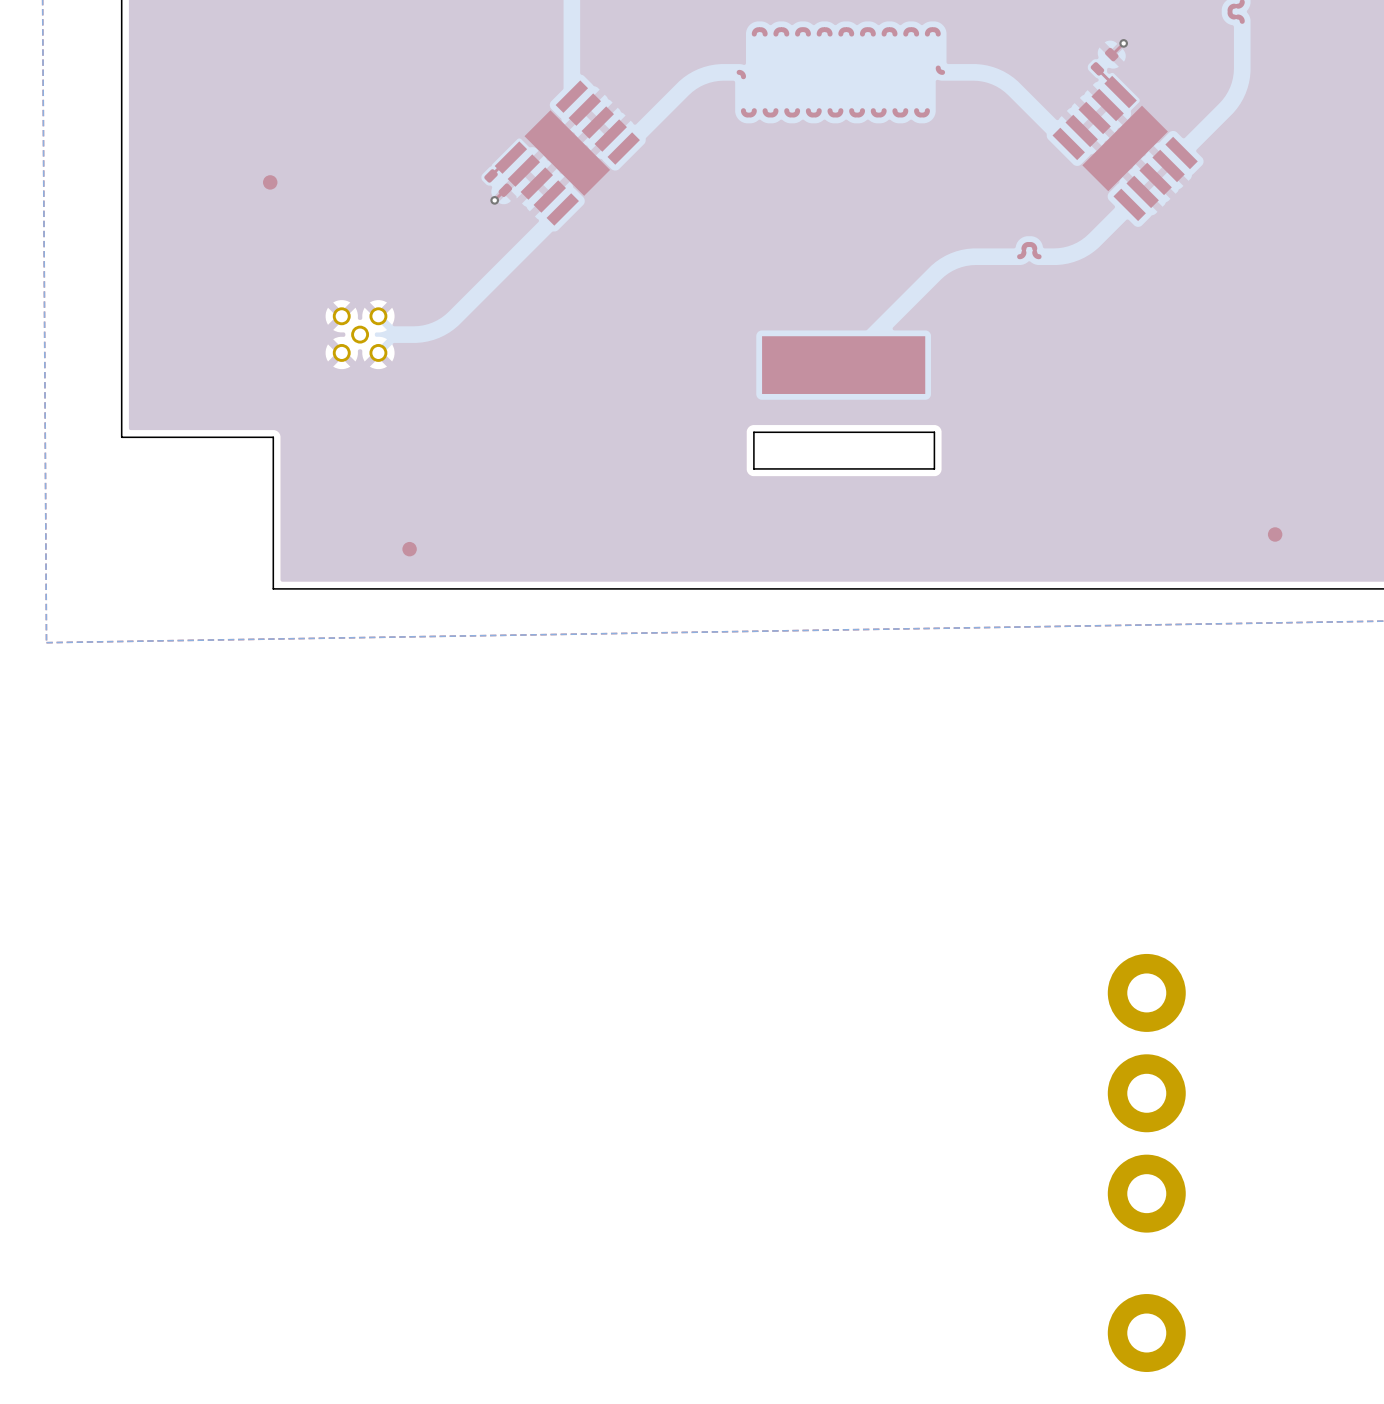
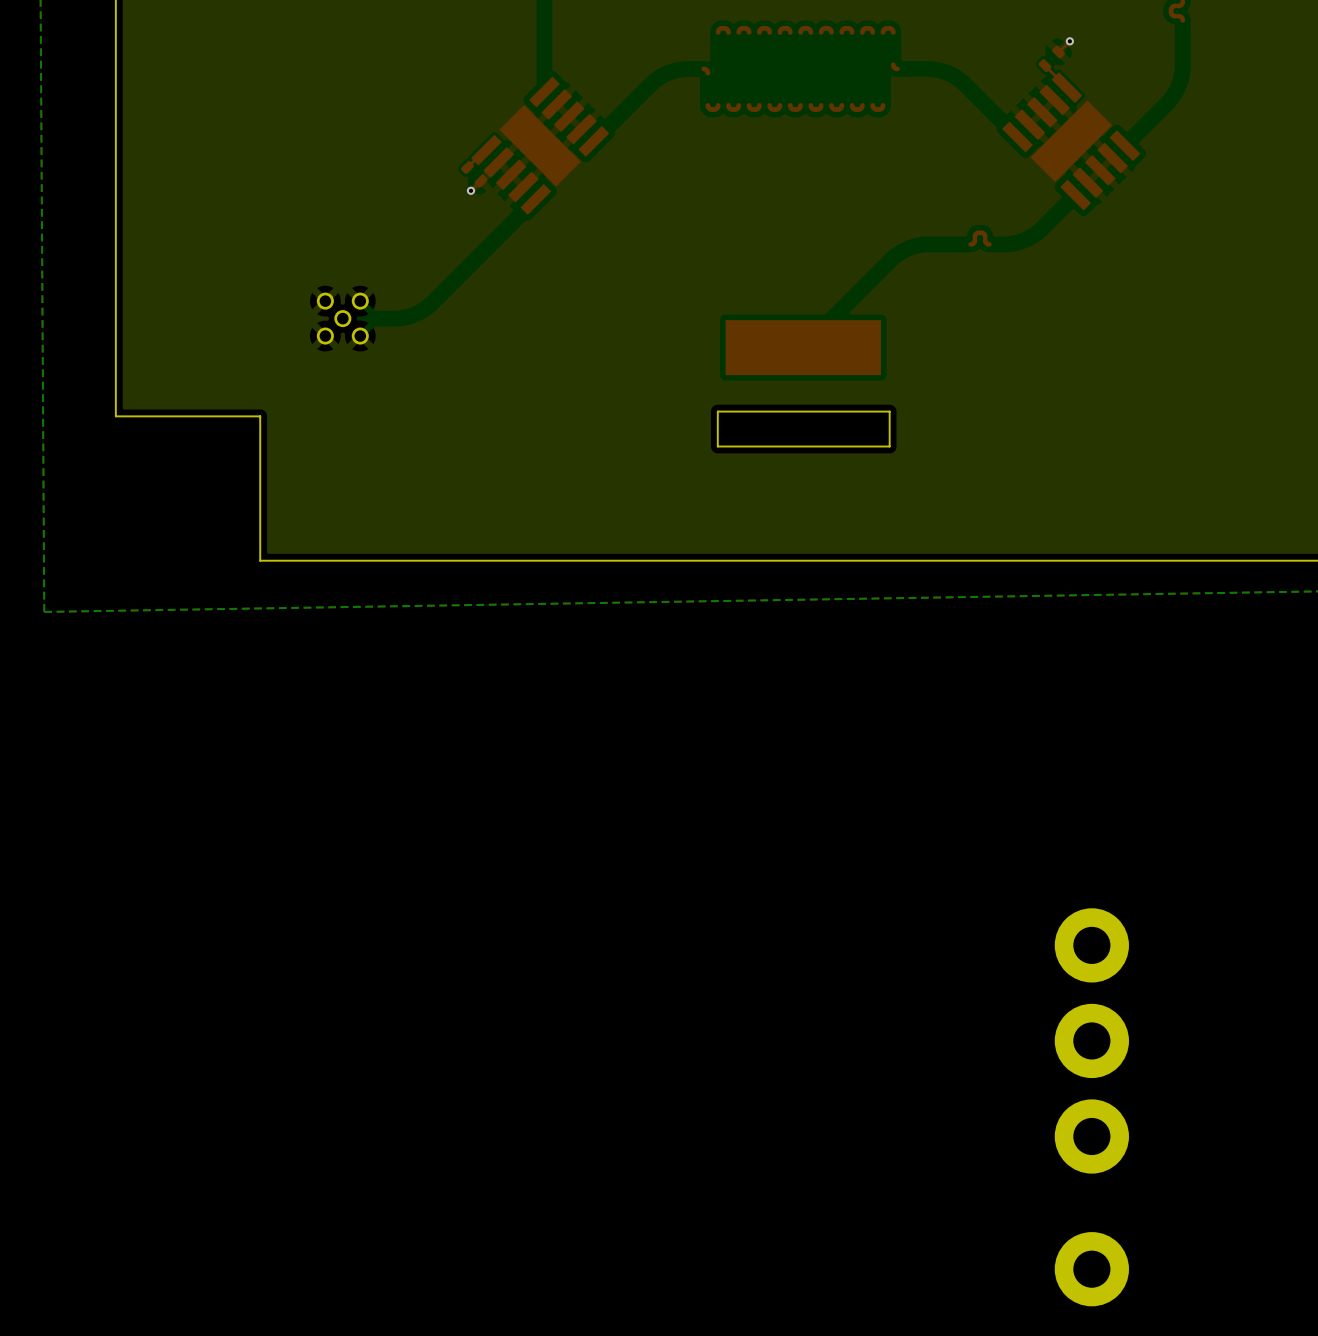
part: (270, 182) -> none
part: (1275, 534) -> none
part: (409, 549) -> none

